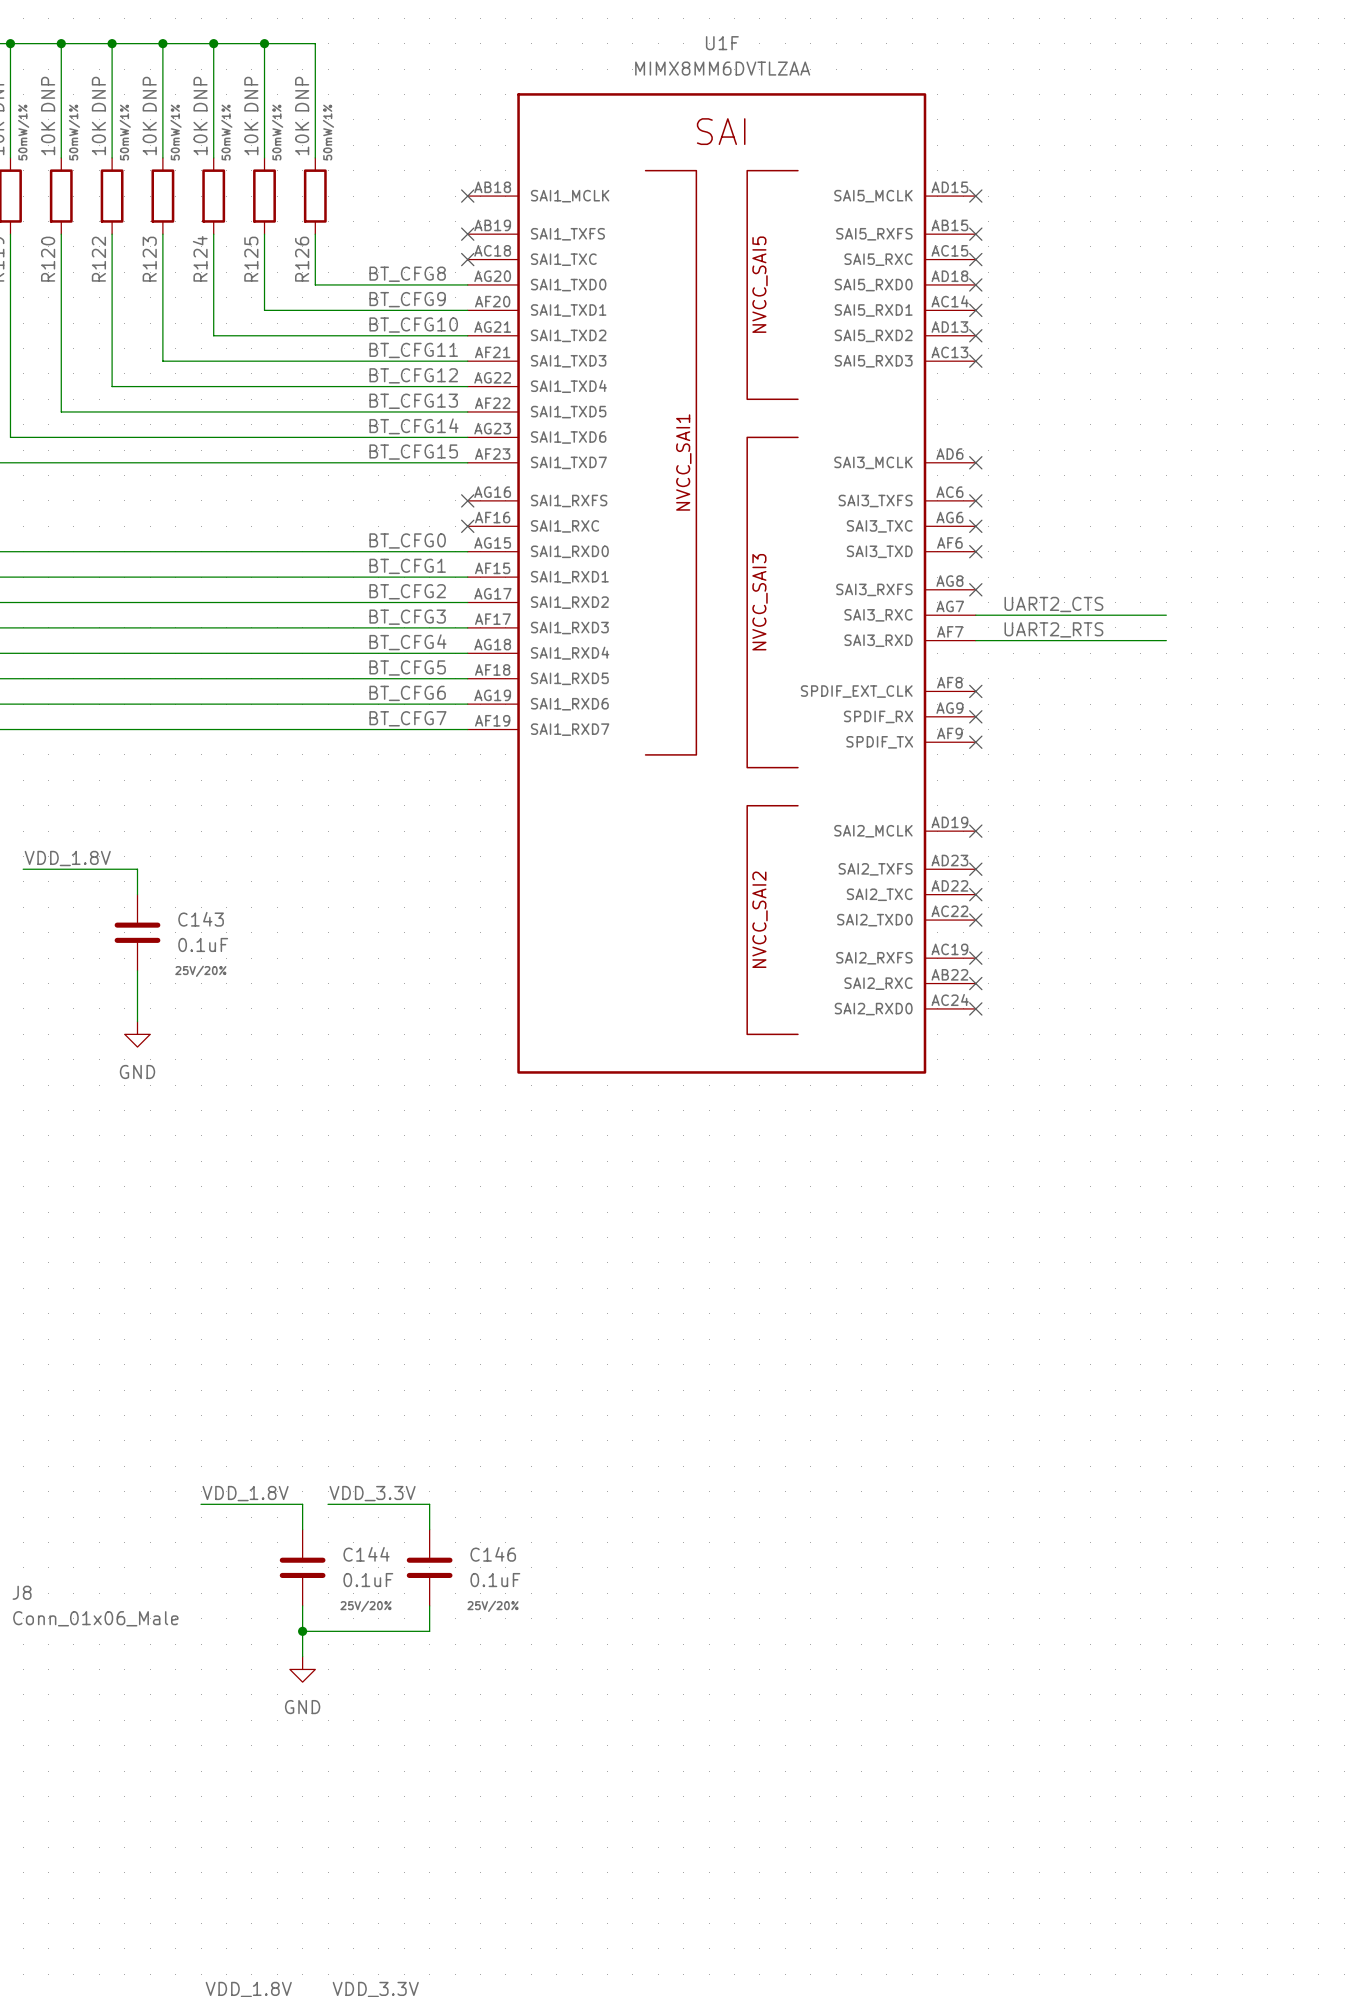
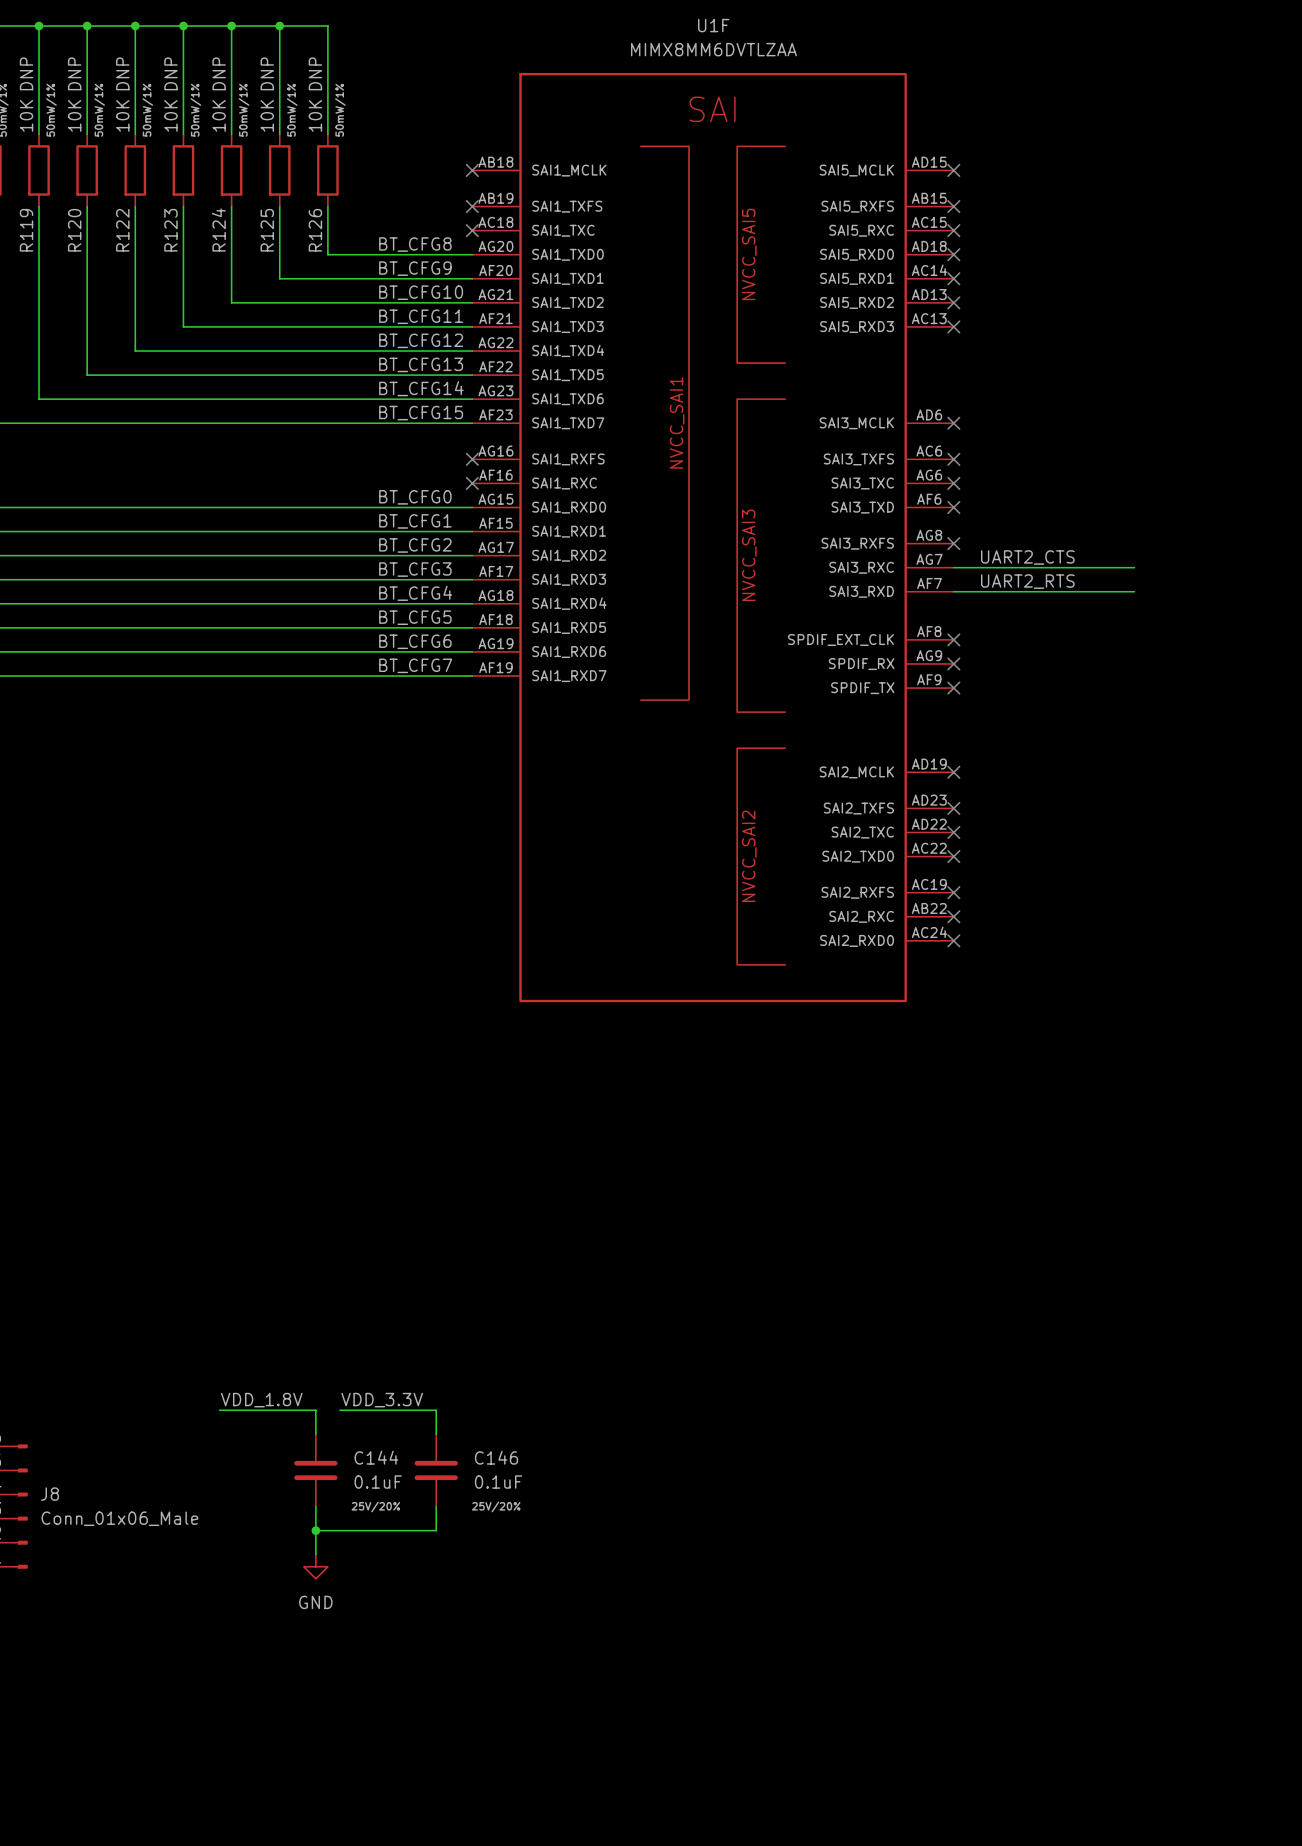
label: VDD_1.8V (67, 858) -> none
wire: (23, 869) (137, 869) (137, 894) -> none
C143: 0.1uF (137, 932) -> none
wire: (137, 970) (137, 1021) -> none
power symbol: GND (137, 1034) -> none

